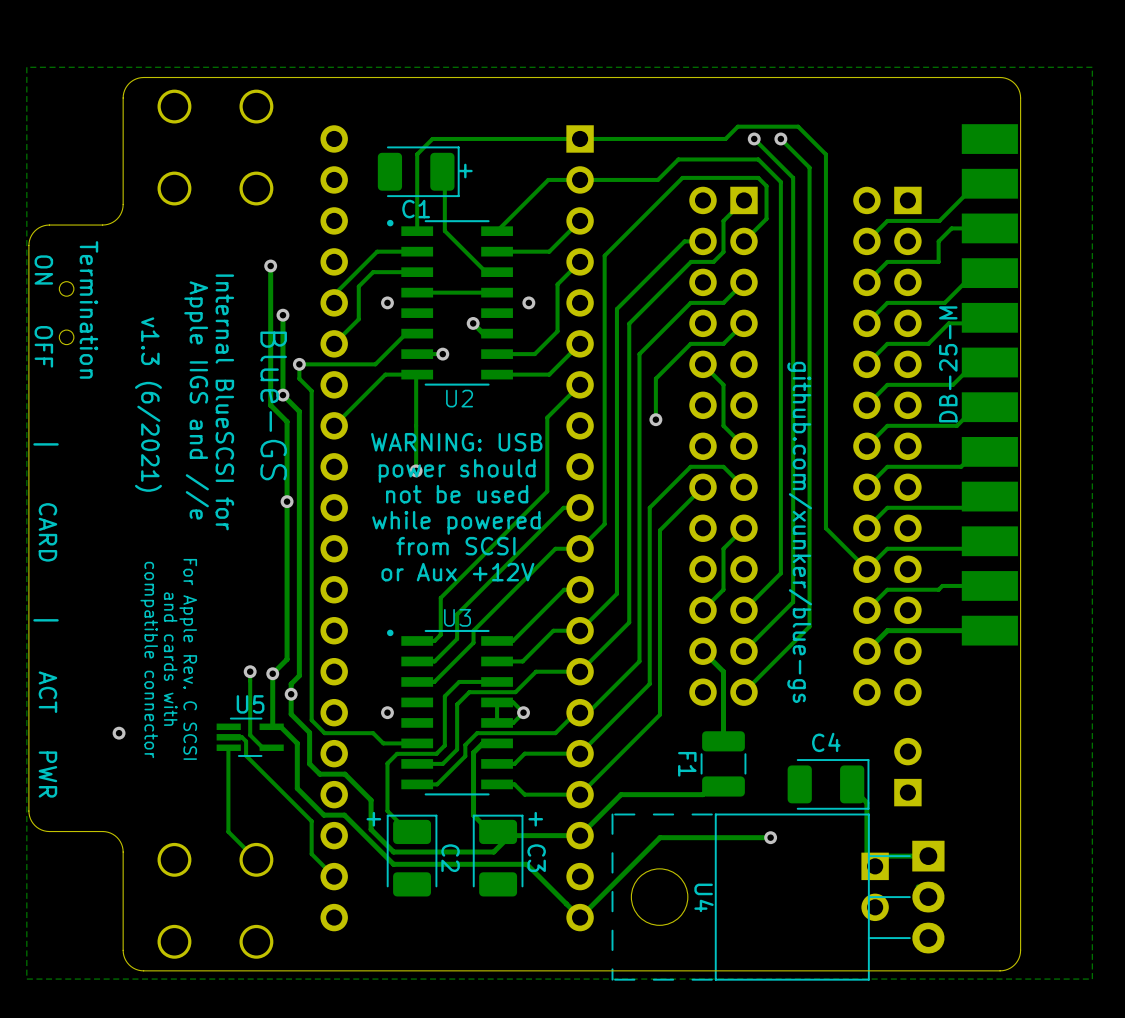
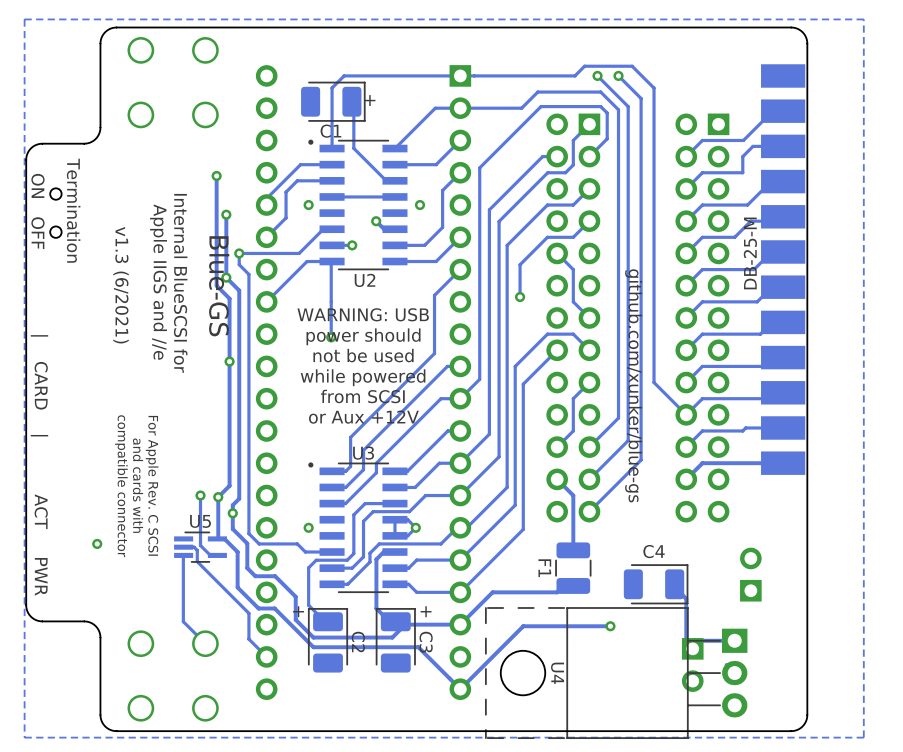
part position: (907, 772) -> (750, 574)

